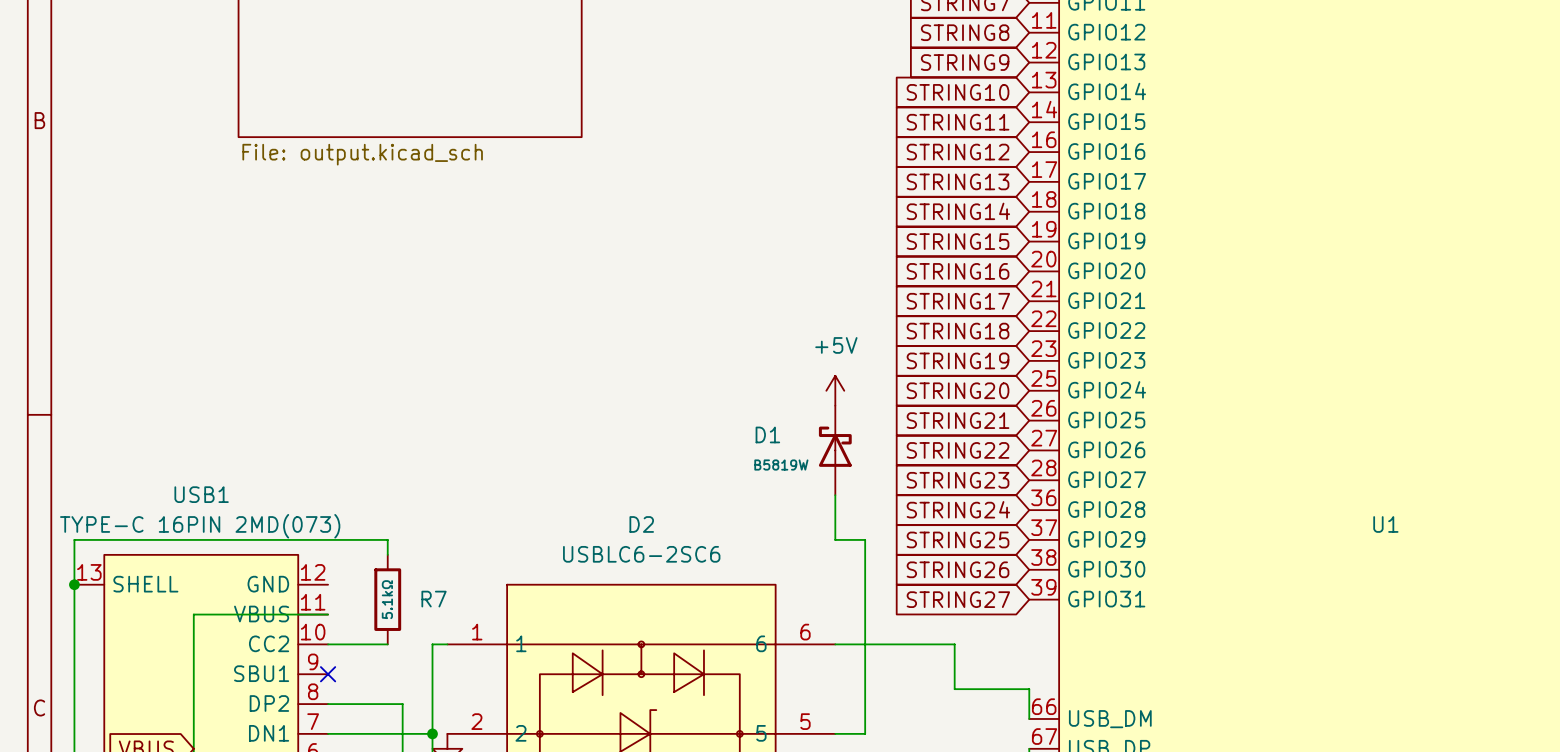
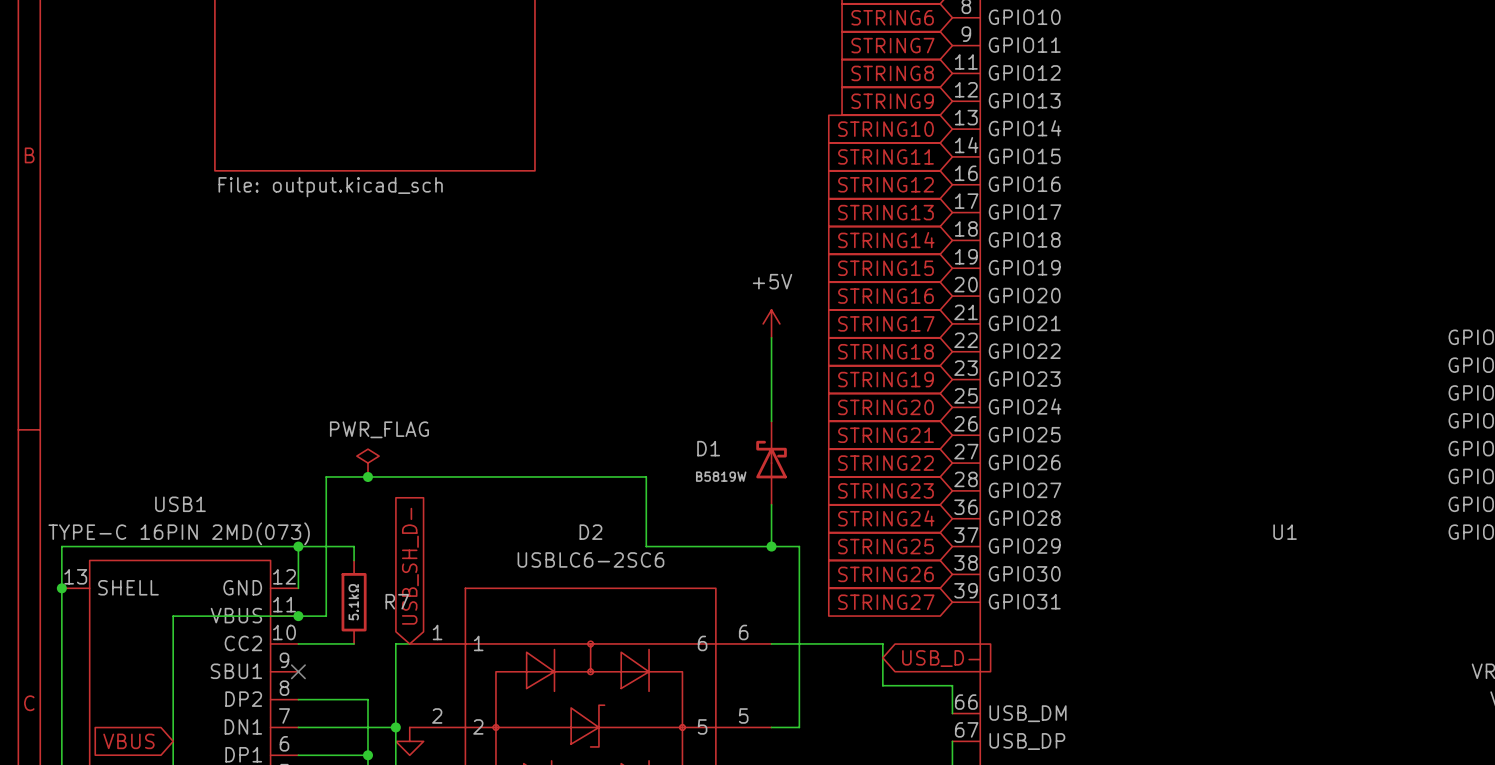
wire: none -> (771, 337) (771, 421)
power symbol position: +5V (835, 390) -> +5V (771, 323)
power symbol: none -> PWR_FLAG (367, 463)
junction: none -> (367, 476)
wire: none -> (298, 546) (298, 588)
junction: none -> (298, 546)
wire: none -> (771, 546) (646, 546) (646, 476) (326, 476) (326, 616) (298, 616)
junction: none -> (771, 546)
global label: none -> USB_SH_D- (410, 566)
junction: none -> (298, 616)
global label: none -> USB_D- (941, 658)

